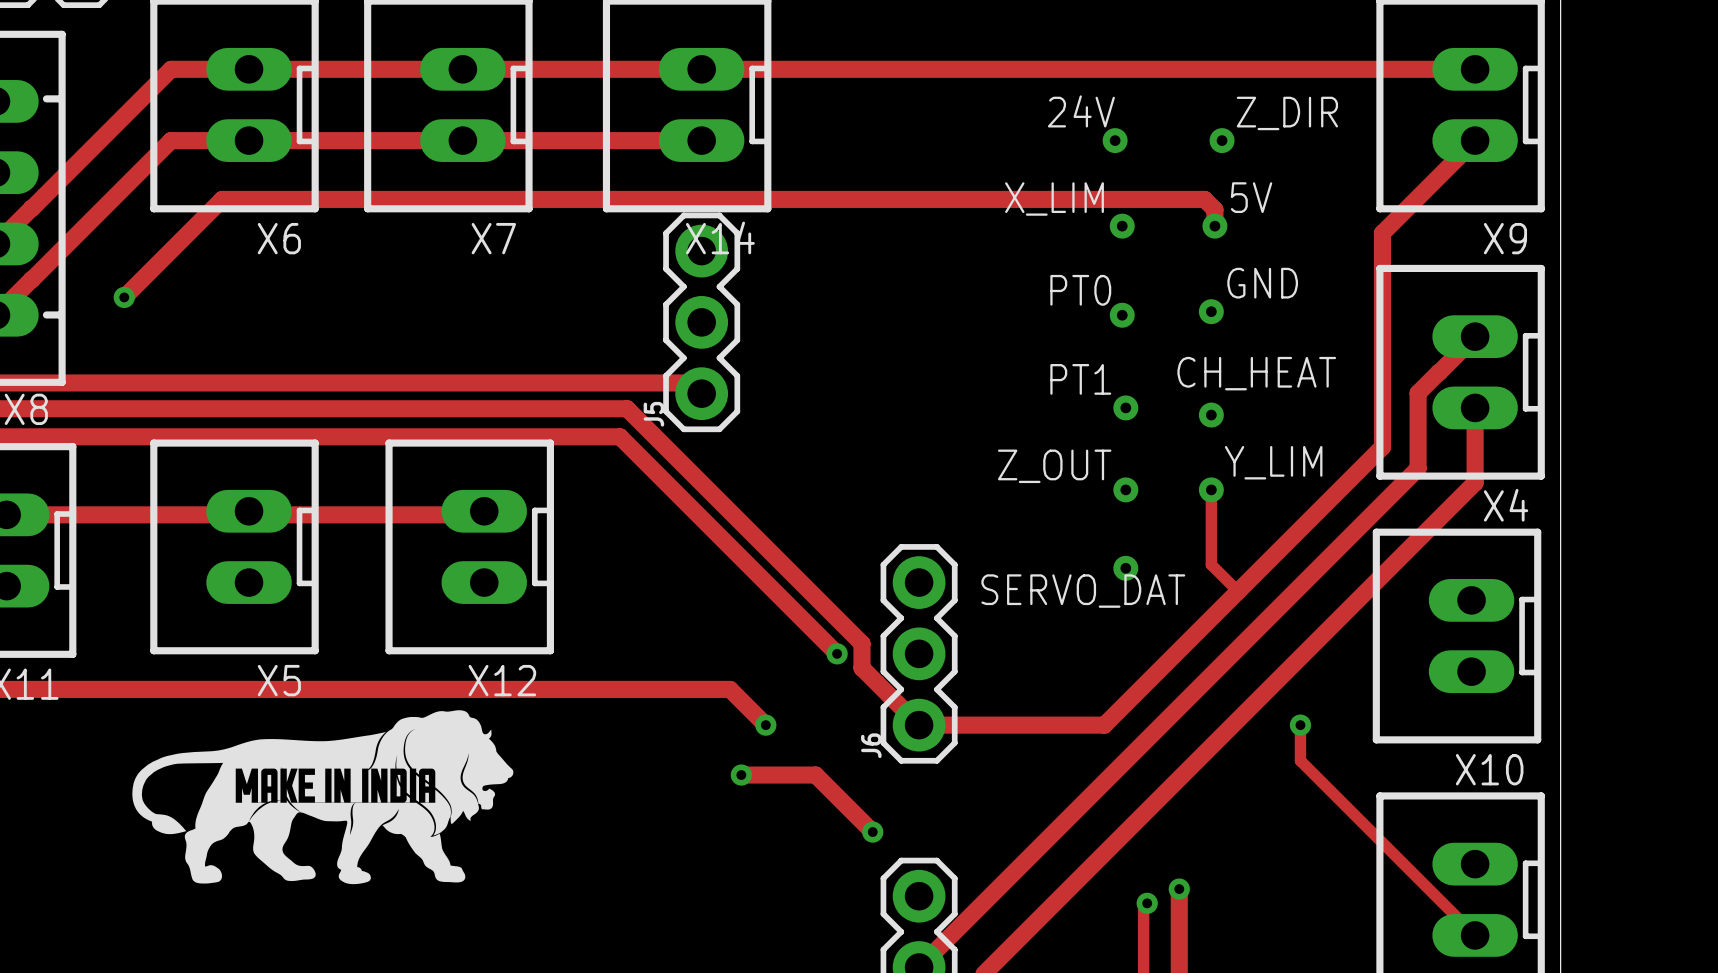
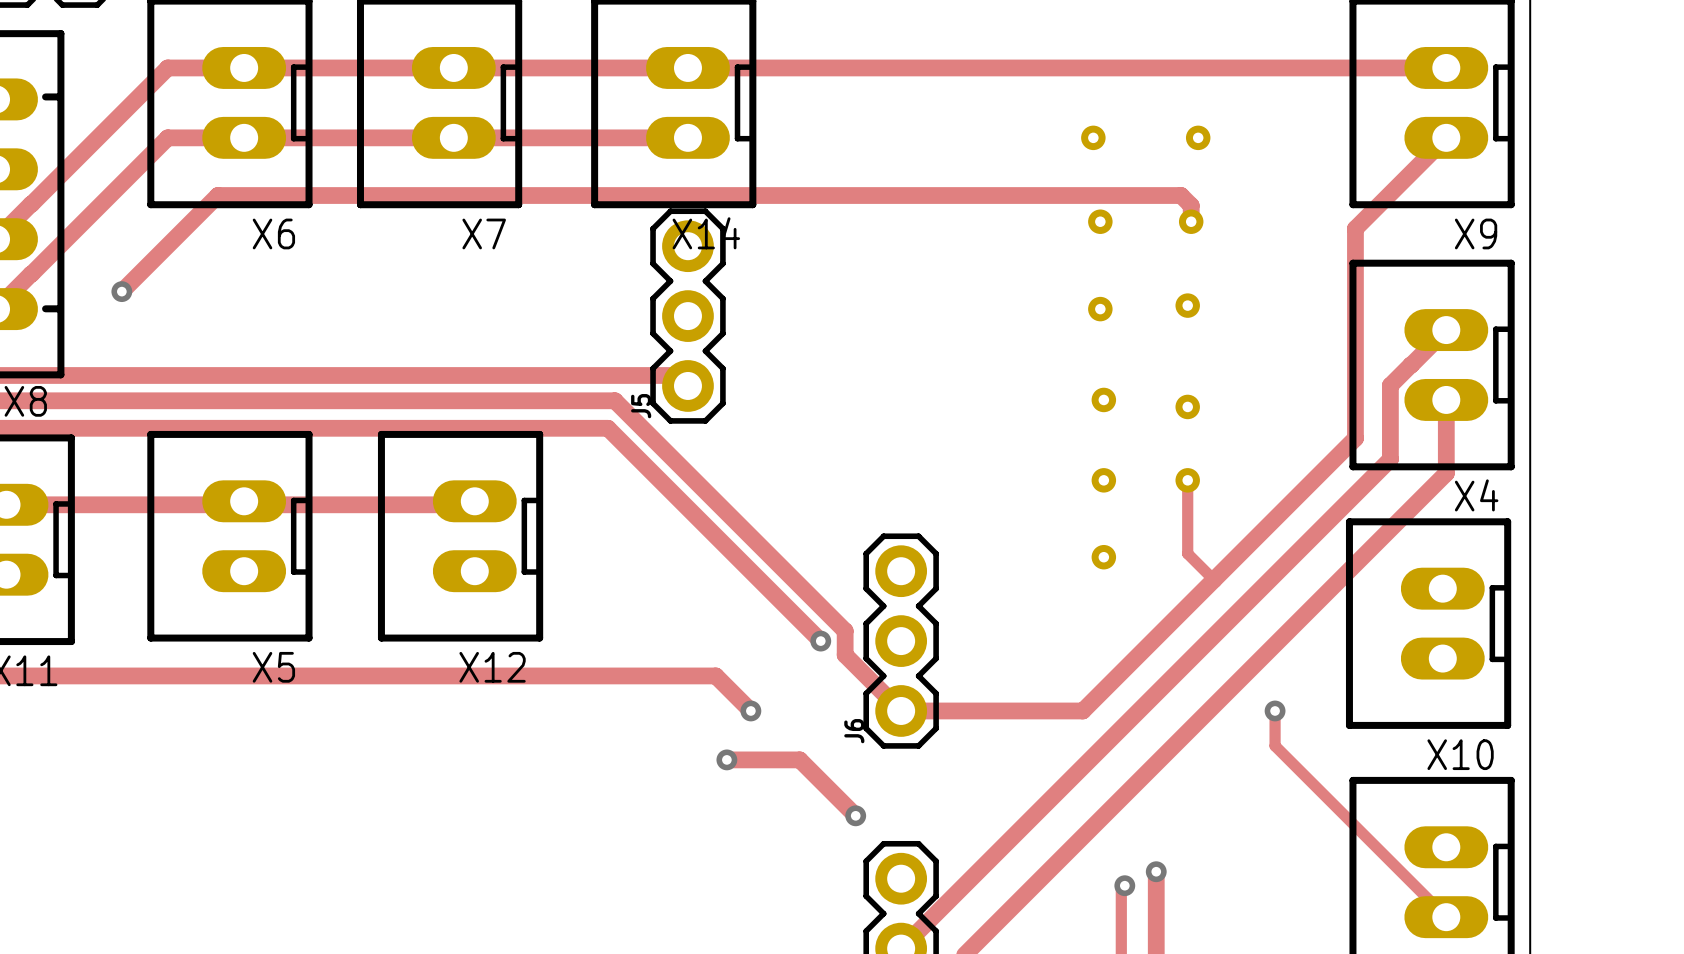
text: 24V (1081, 111) -> none
text: Z_DIR (1287, 113) -> none
text: 5V (1251, 197) -> none
text: X_LIM (1054, 198) -> none
text: GND (1262, 283) -> none
text: PT0 (1080, 290) -> none
text: CH_HEAT (1256, 373) -> none
text: PT1 (1080, 379) -> none
text: Y_LIM (1273, 462) -> none
text: Z_OUT (1054, 466) -> none
text: SERVO_DAT (1083, 591) -> none
drawing: [132, 710, 514, 885] -> none

